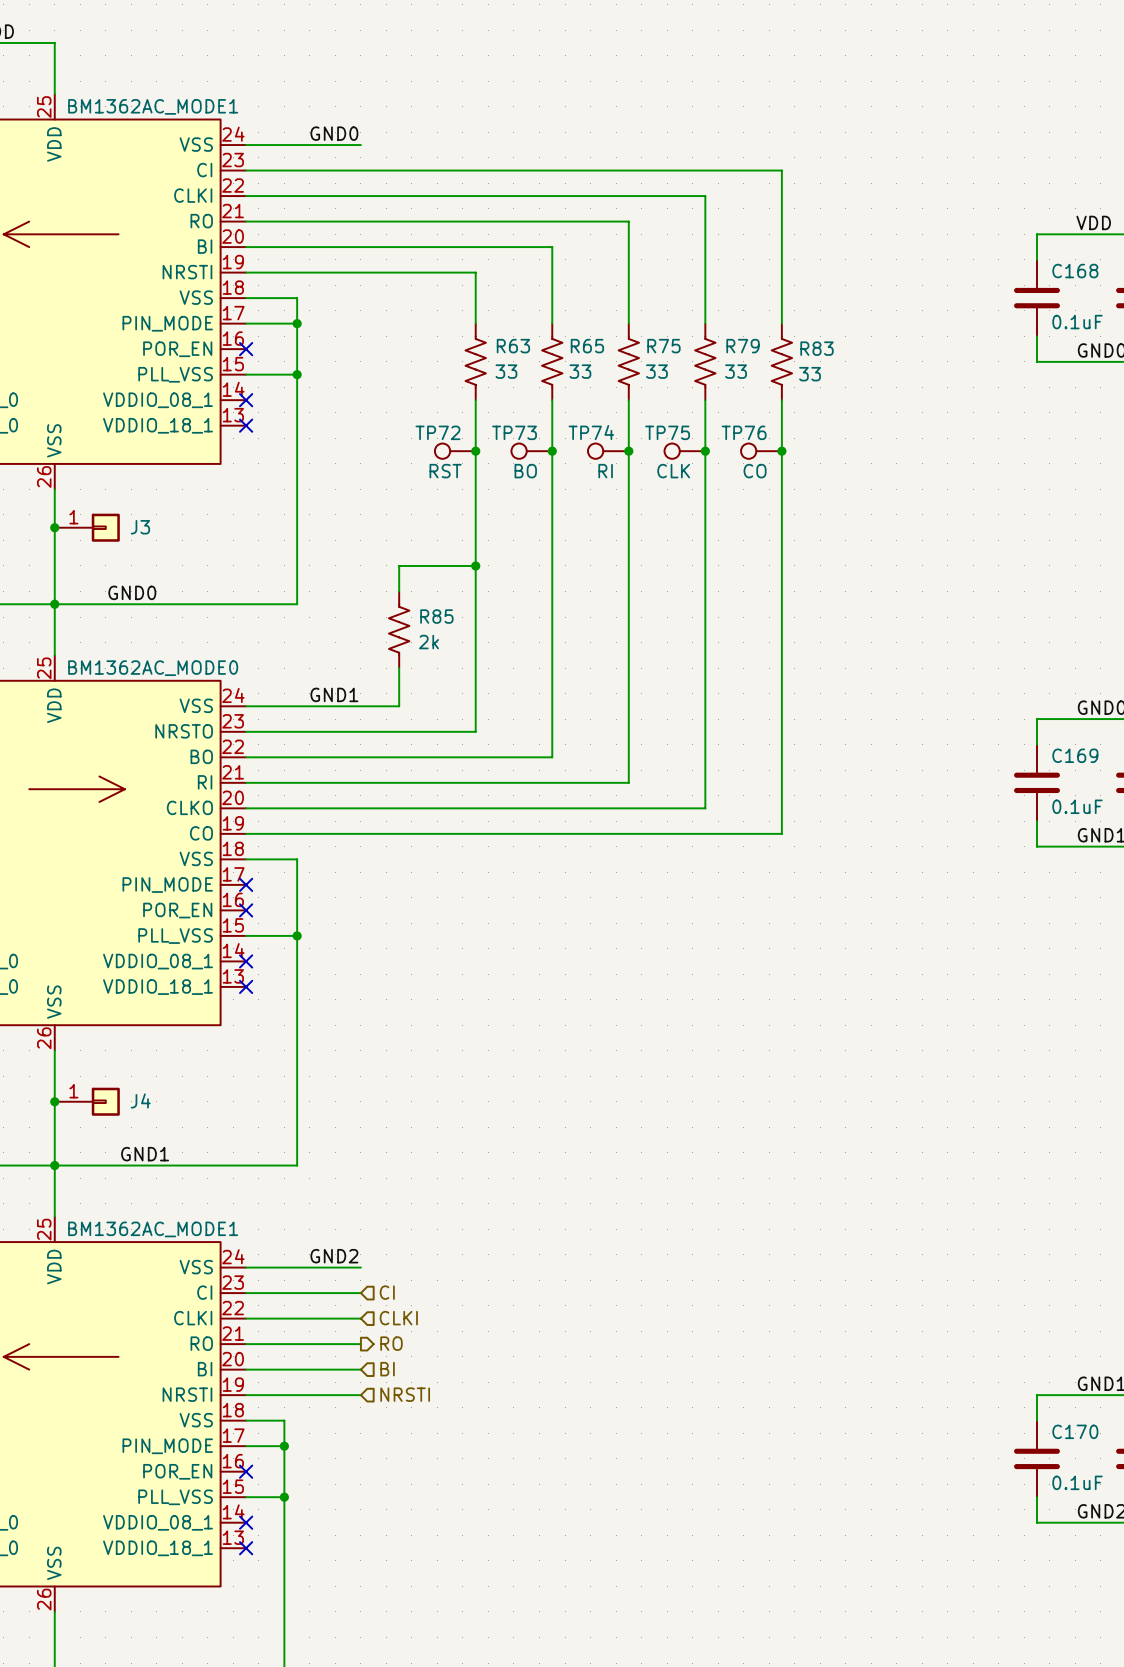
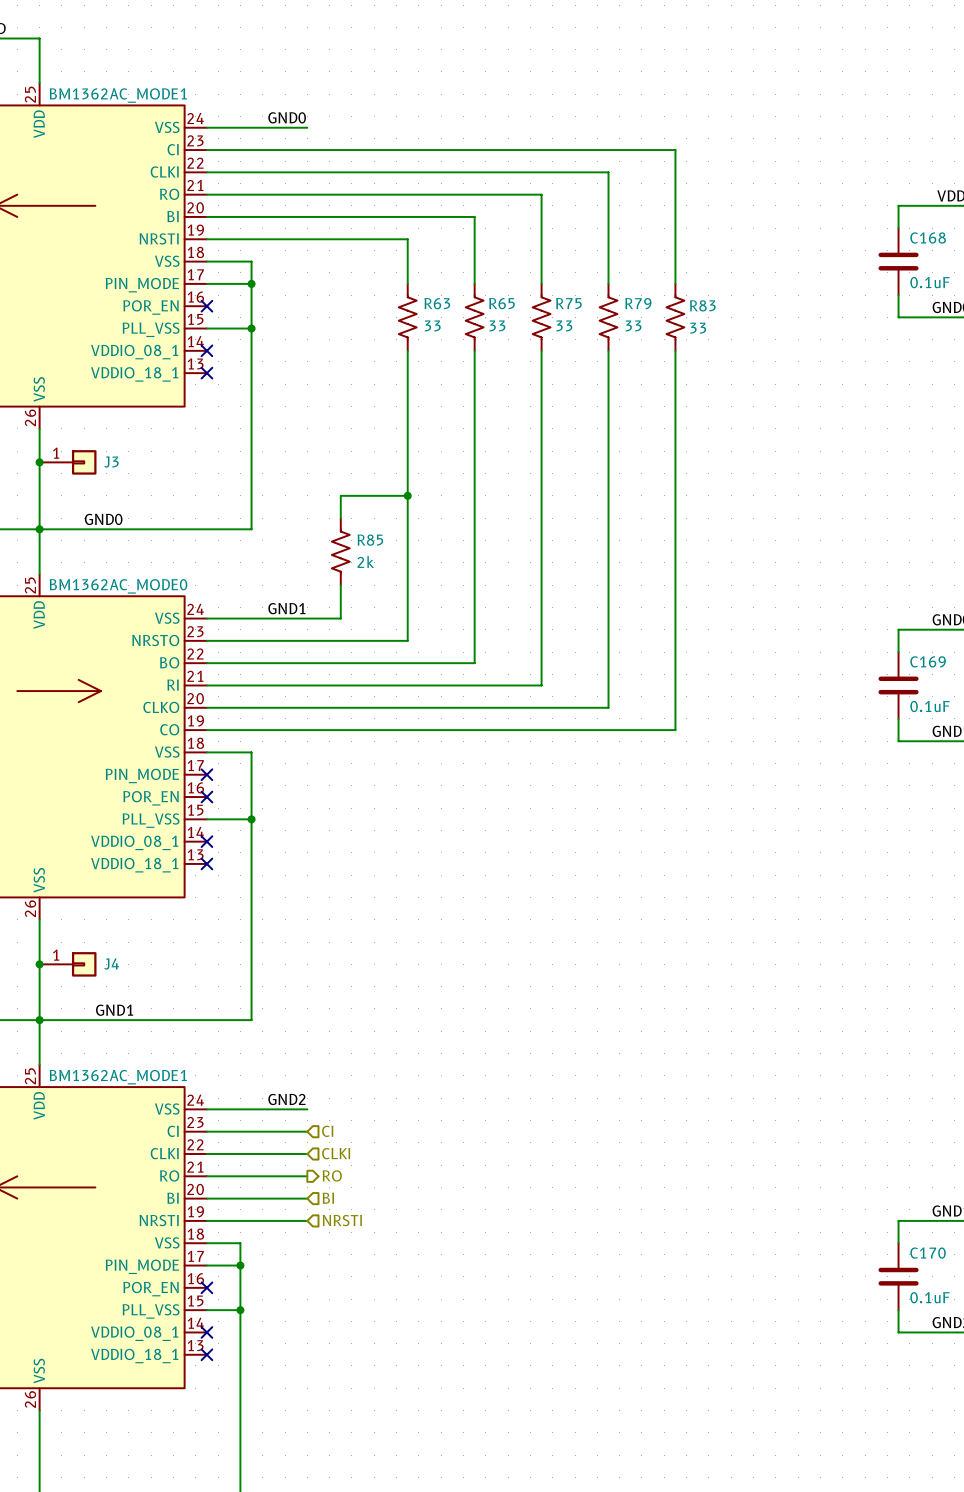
TP72: RST (455, 451) -> none
junction: (475, 451) -> none
TP73: BO (531, 451) -> none
junction: (552, 451) -> none
TP74: RI (608, 451) -> none
junction: (628, 451) -> none
TP75: CLK (684, 451) -> none
junction: (705, 451) -> none
TP76: CO (761, 451) -> none
junction: (781, 451) -> none

